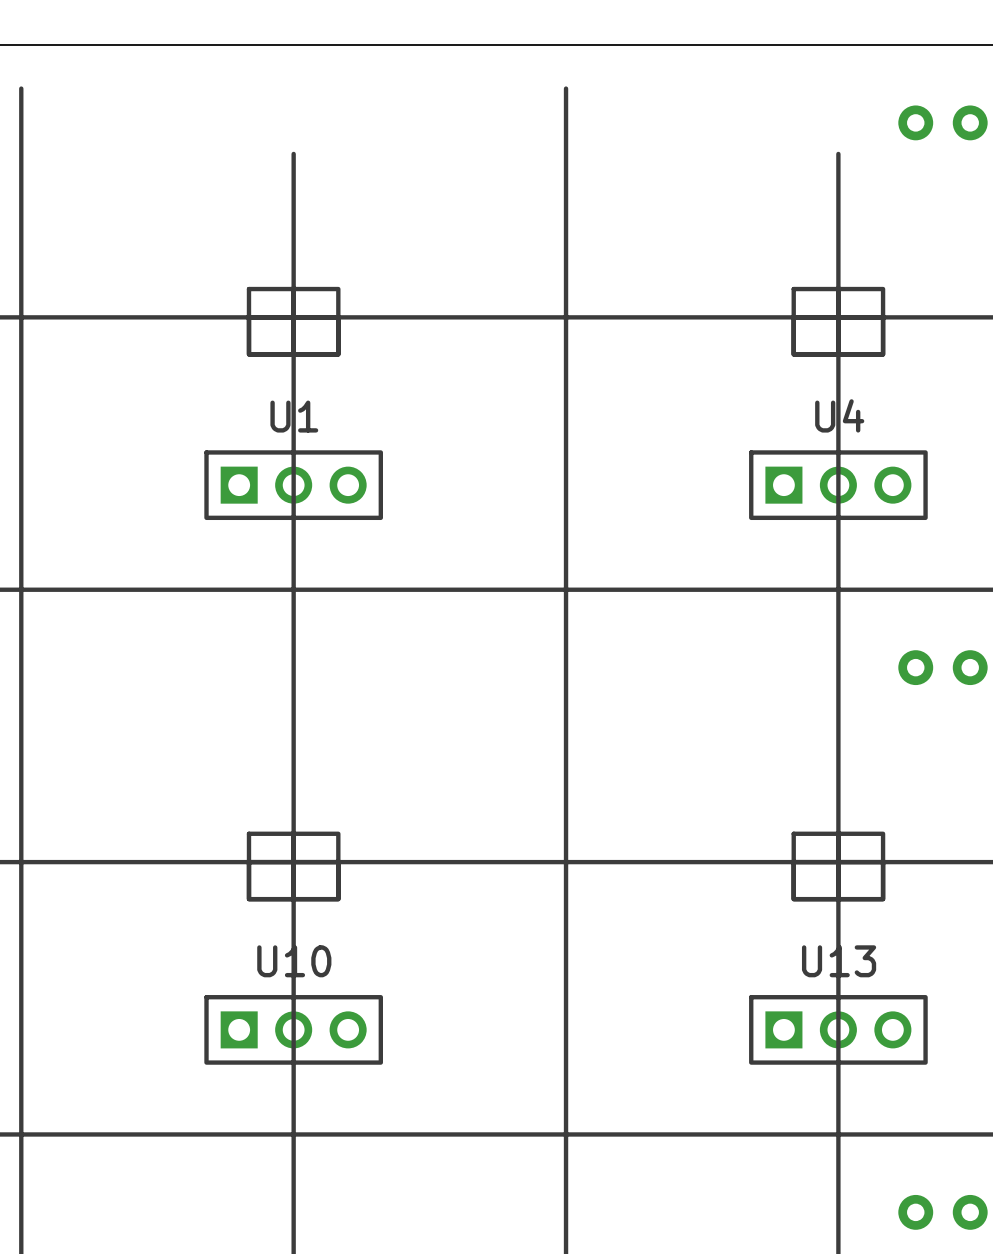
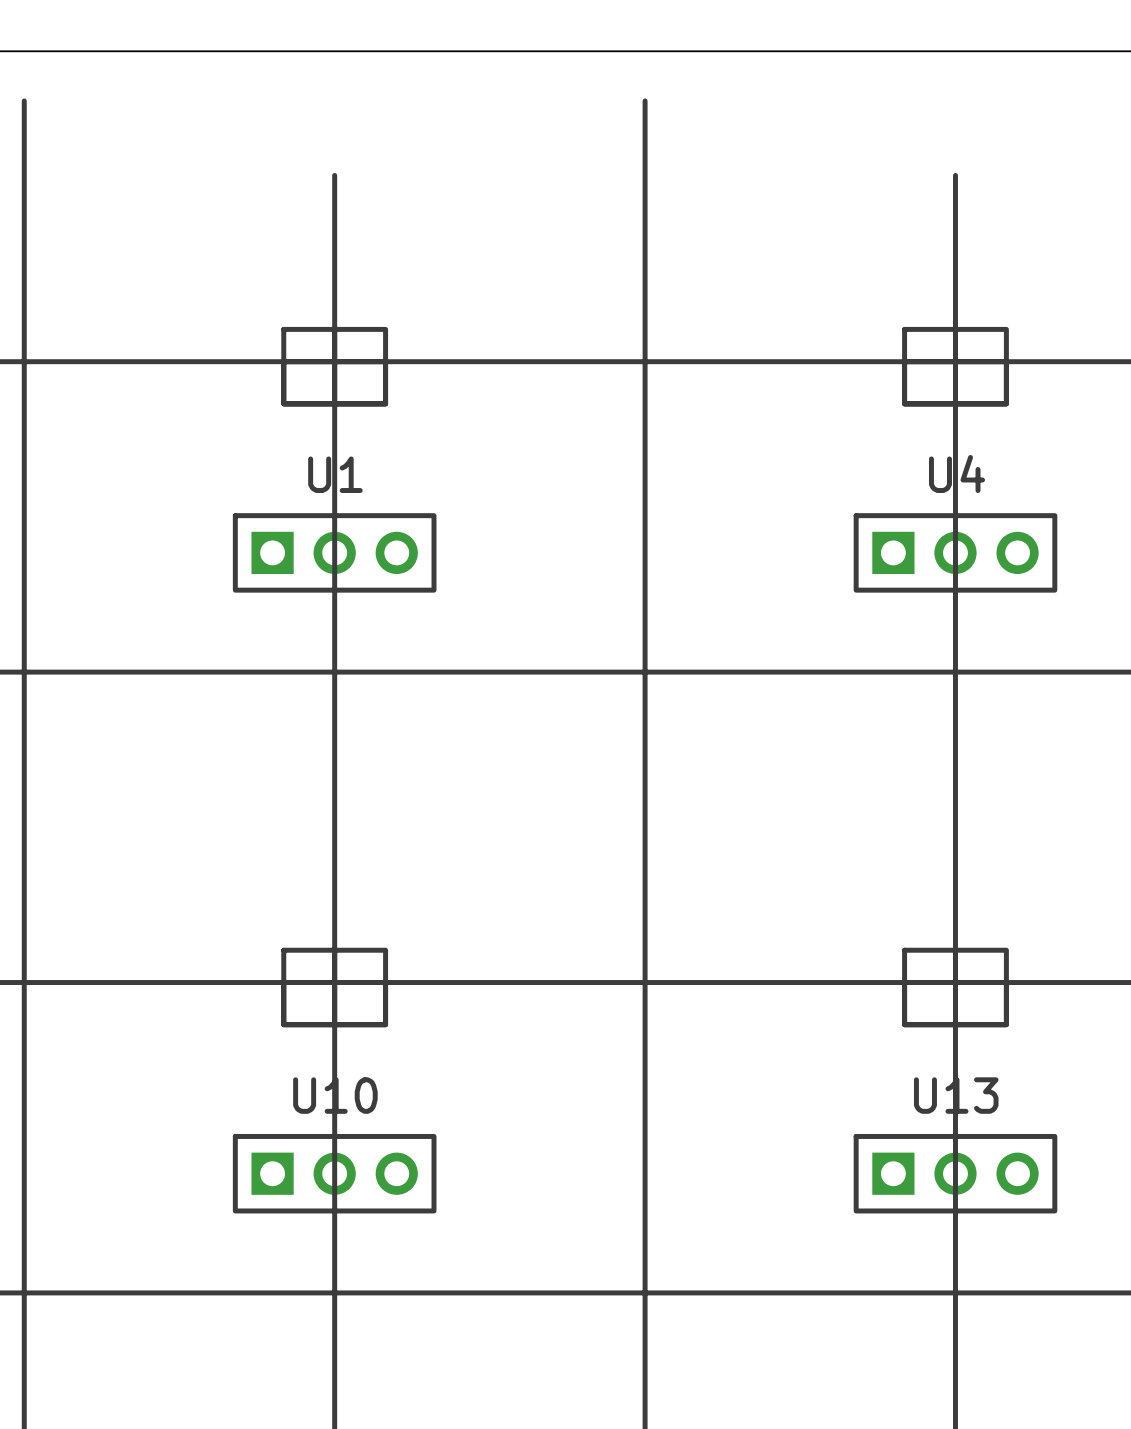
part: (942, 122) -> none
part: (942, 667) -> none
part: (942, 1212) -> none

